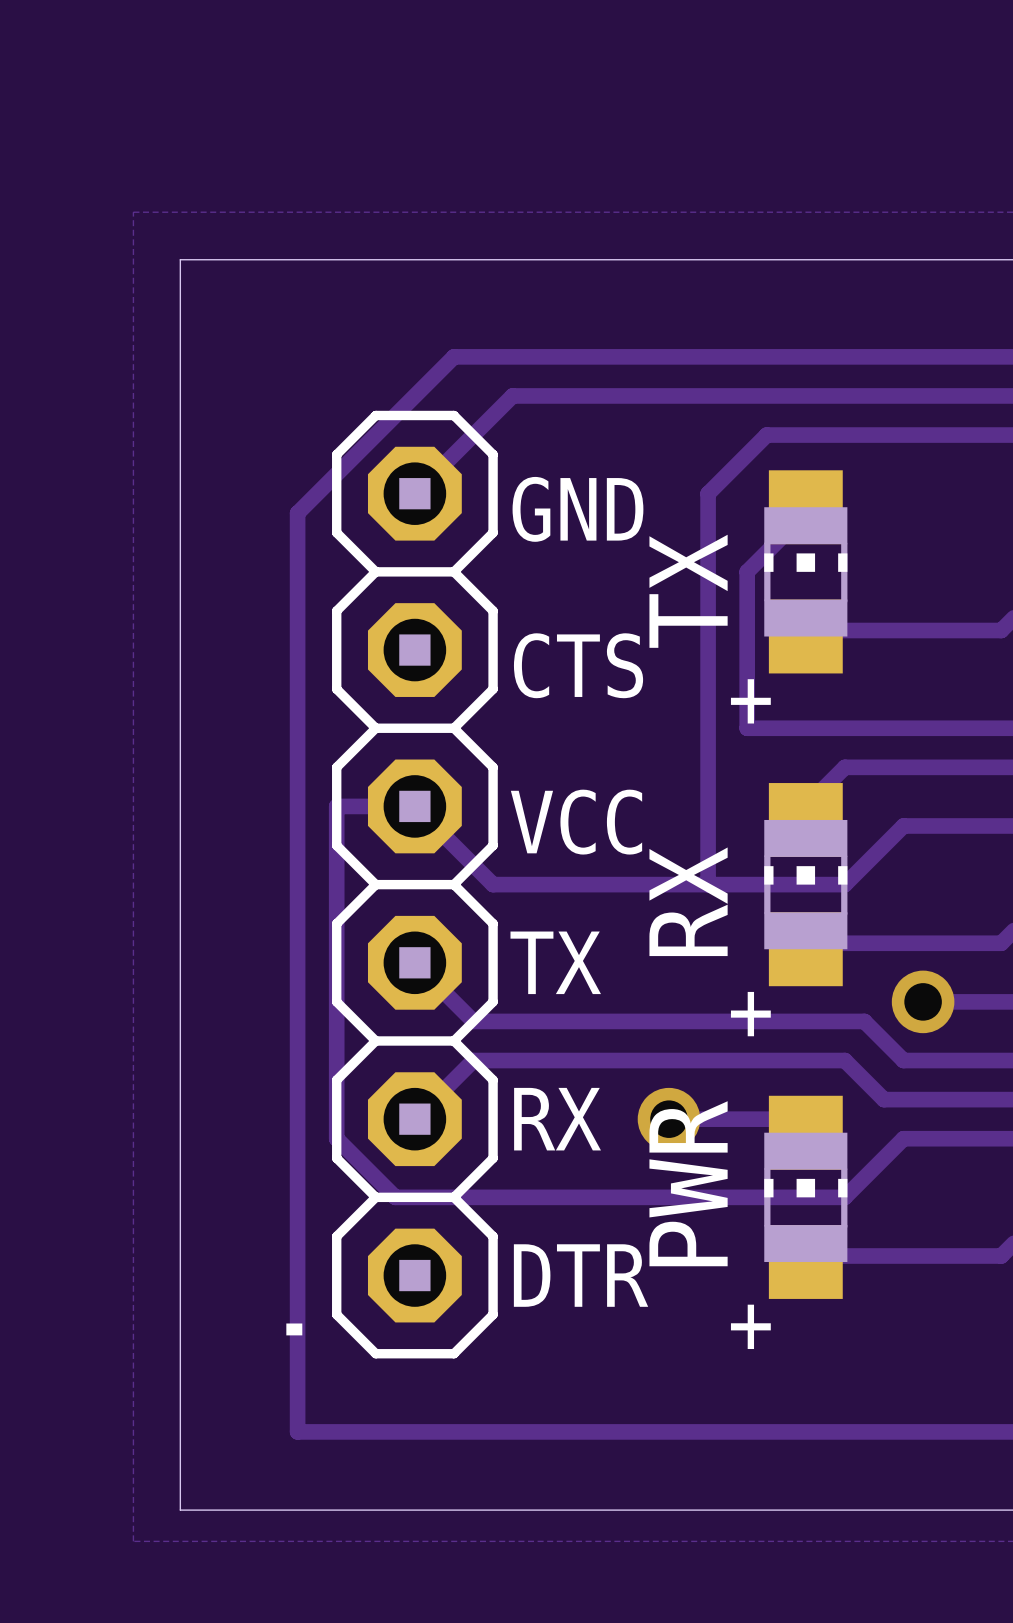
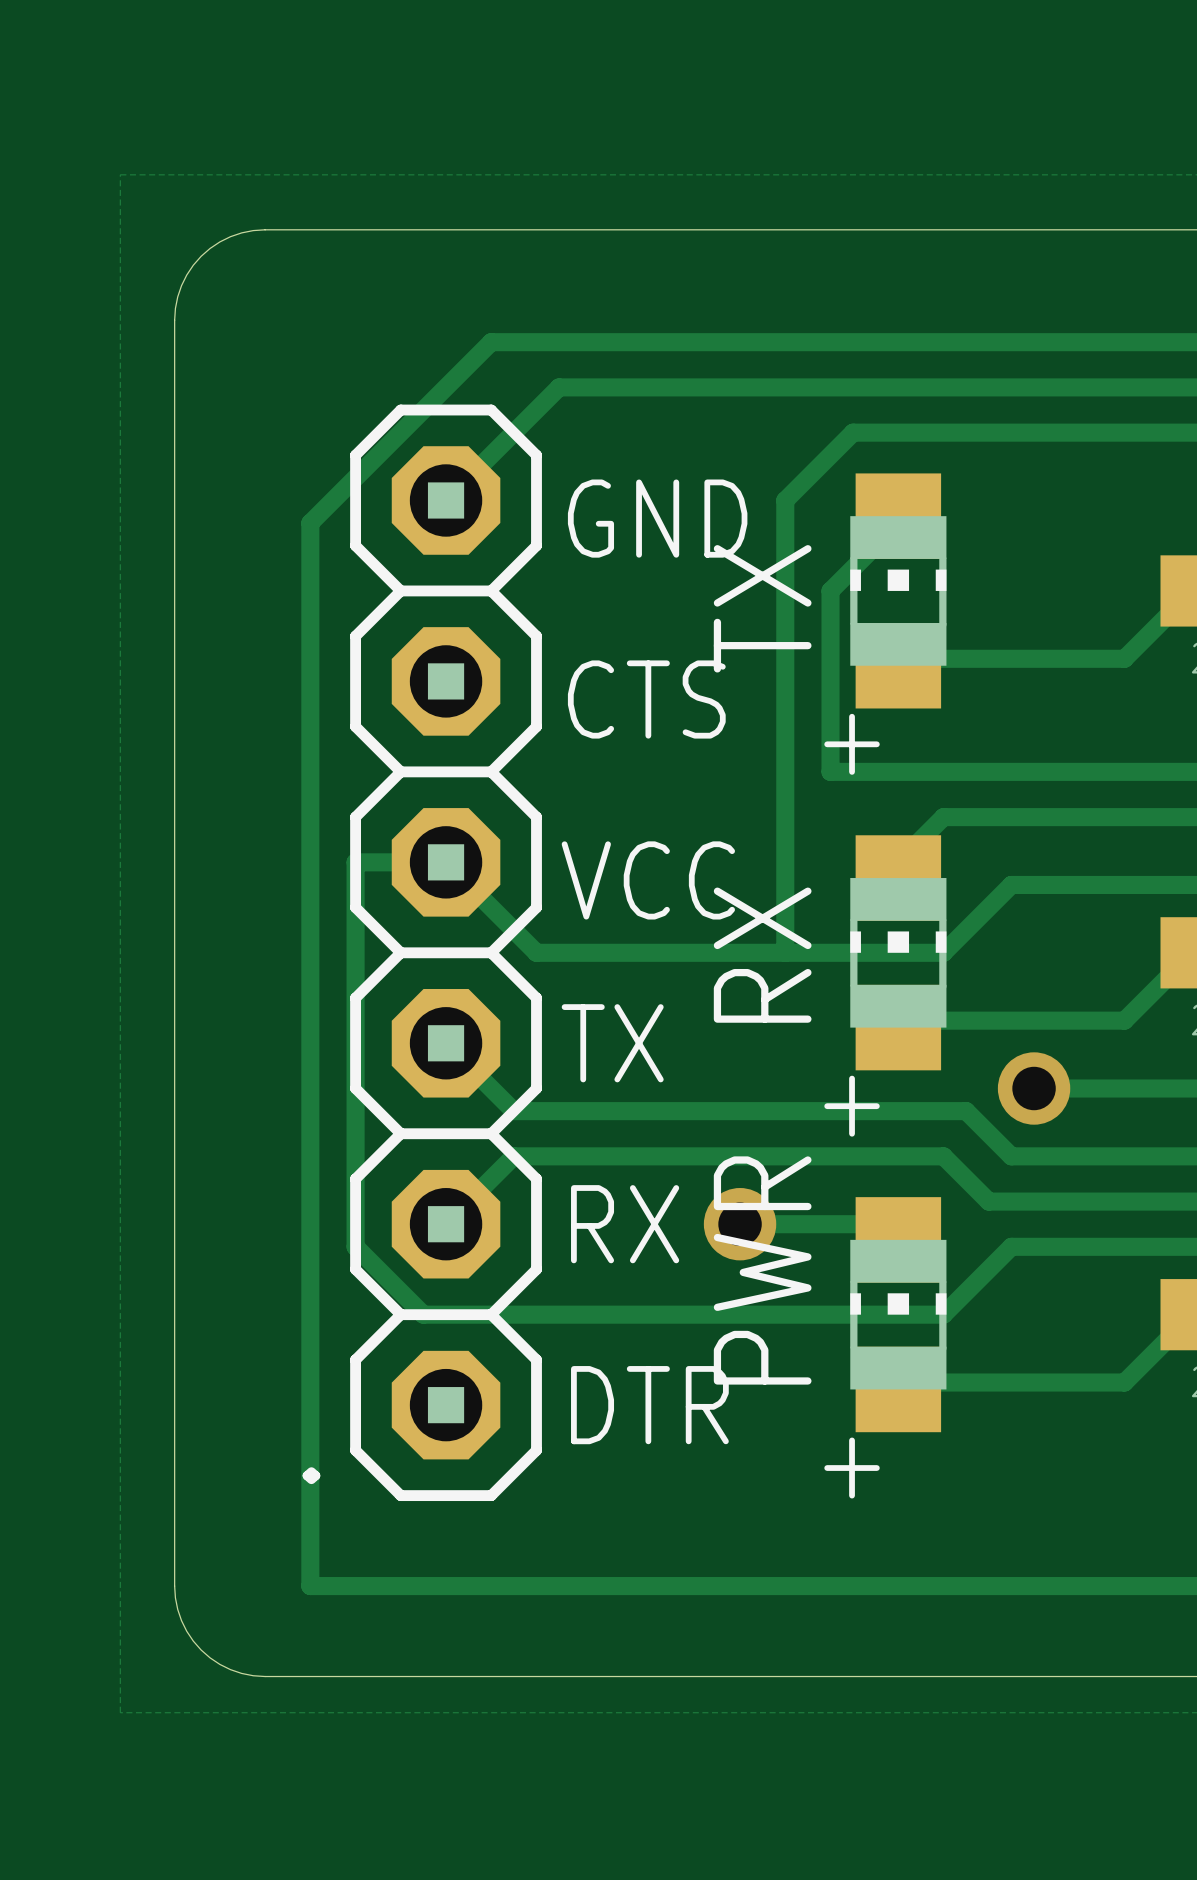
board edge: (258, 259) (180, 259) (180, 337) -> (265, 229) (241, 232) (230, 236) (219, 241) (201, 256) (186, 275) (181, 285) (177, 296) (174, 320)
board edge: (180, 1431) (180, 1510) (258, 1510) -> (174, 1586) (177, 1609) (181, 1620) (186, 1631) (201, 1650) (219, 1664) (230, 1669) (241, 1673) (265, 1676)

